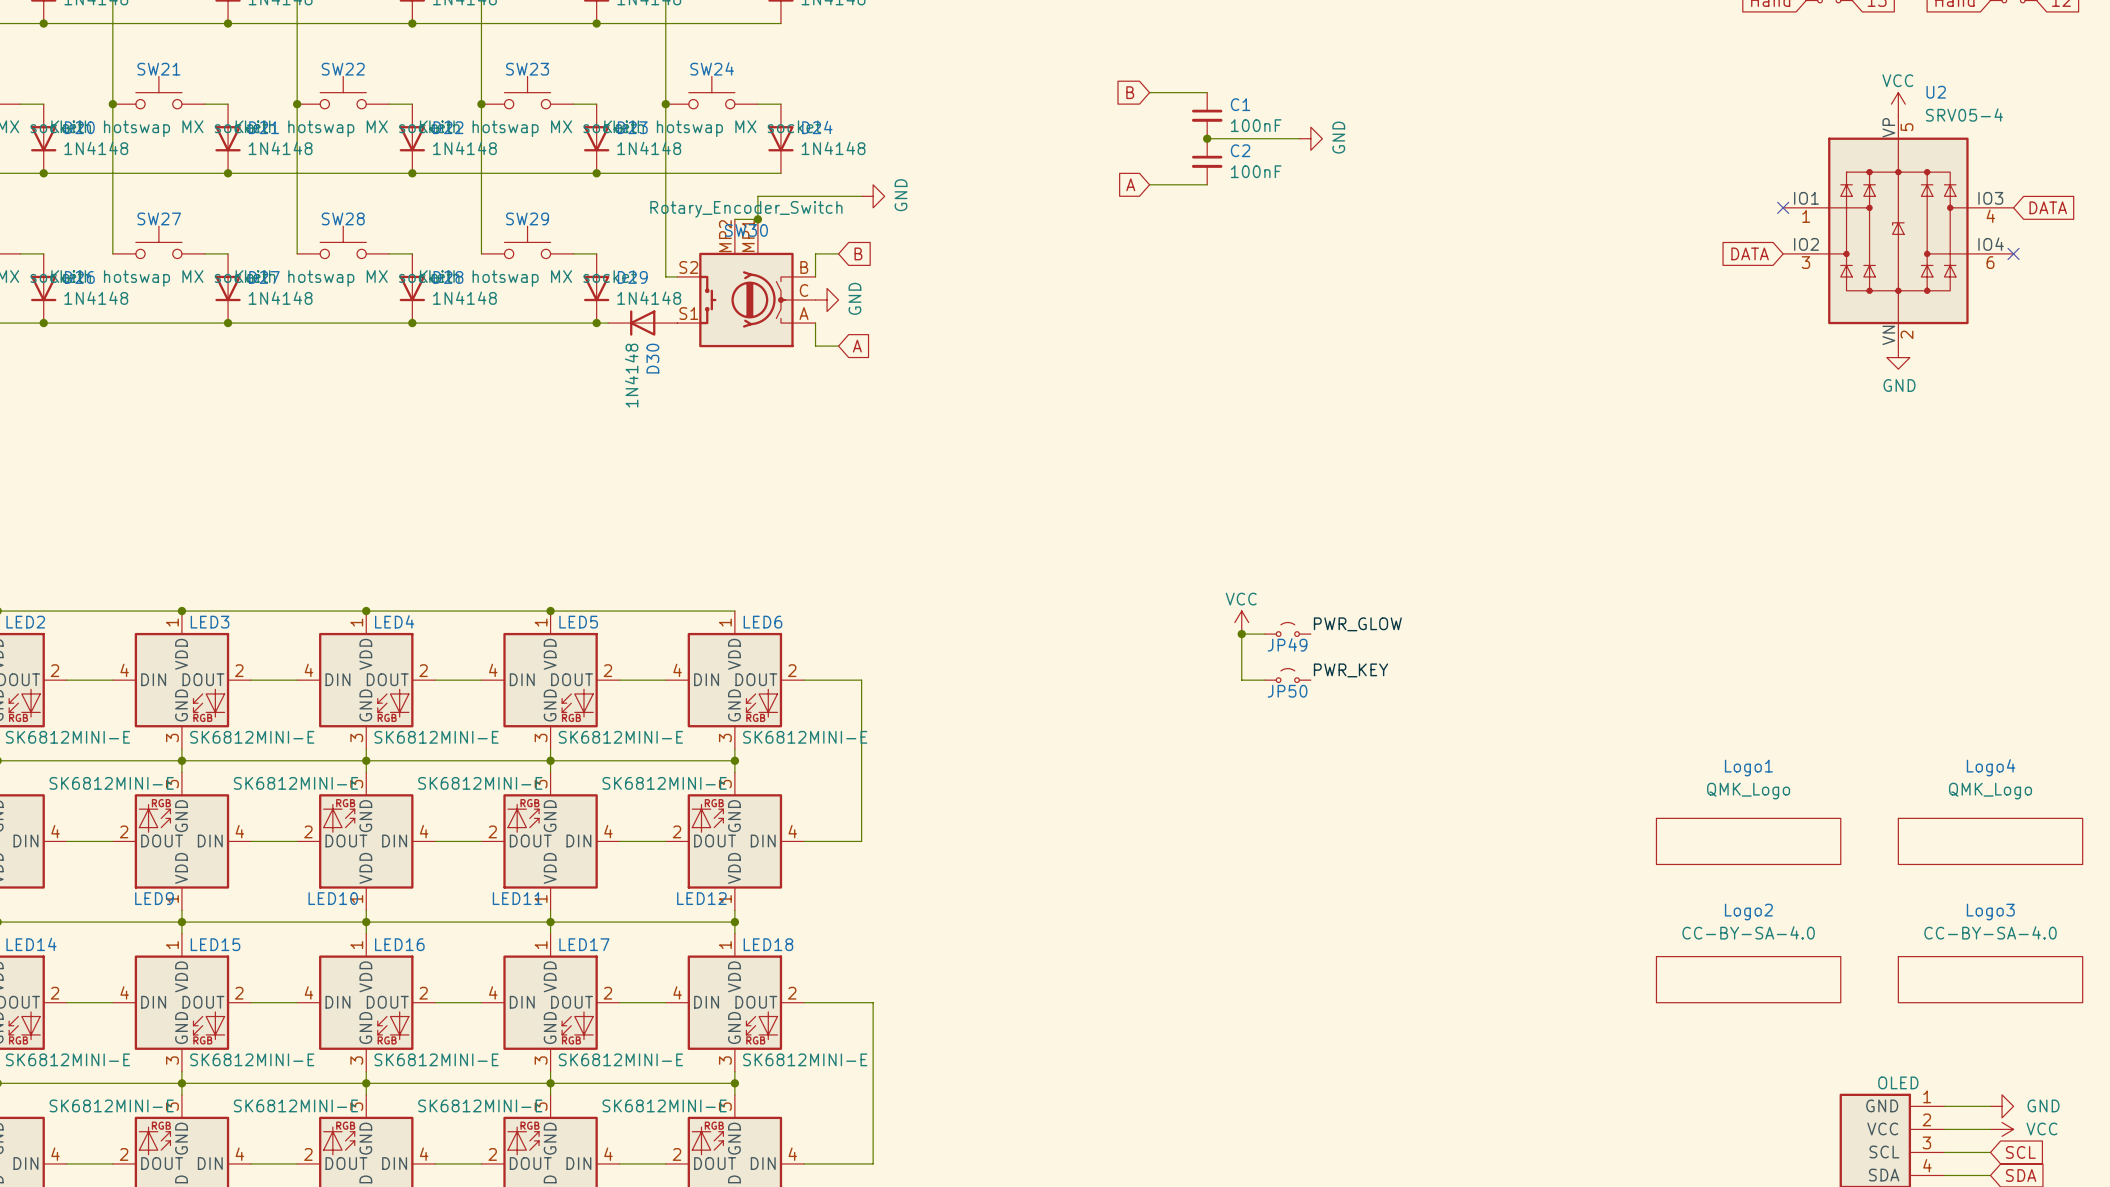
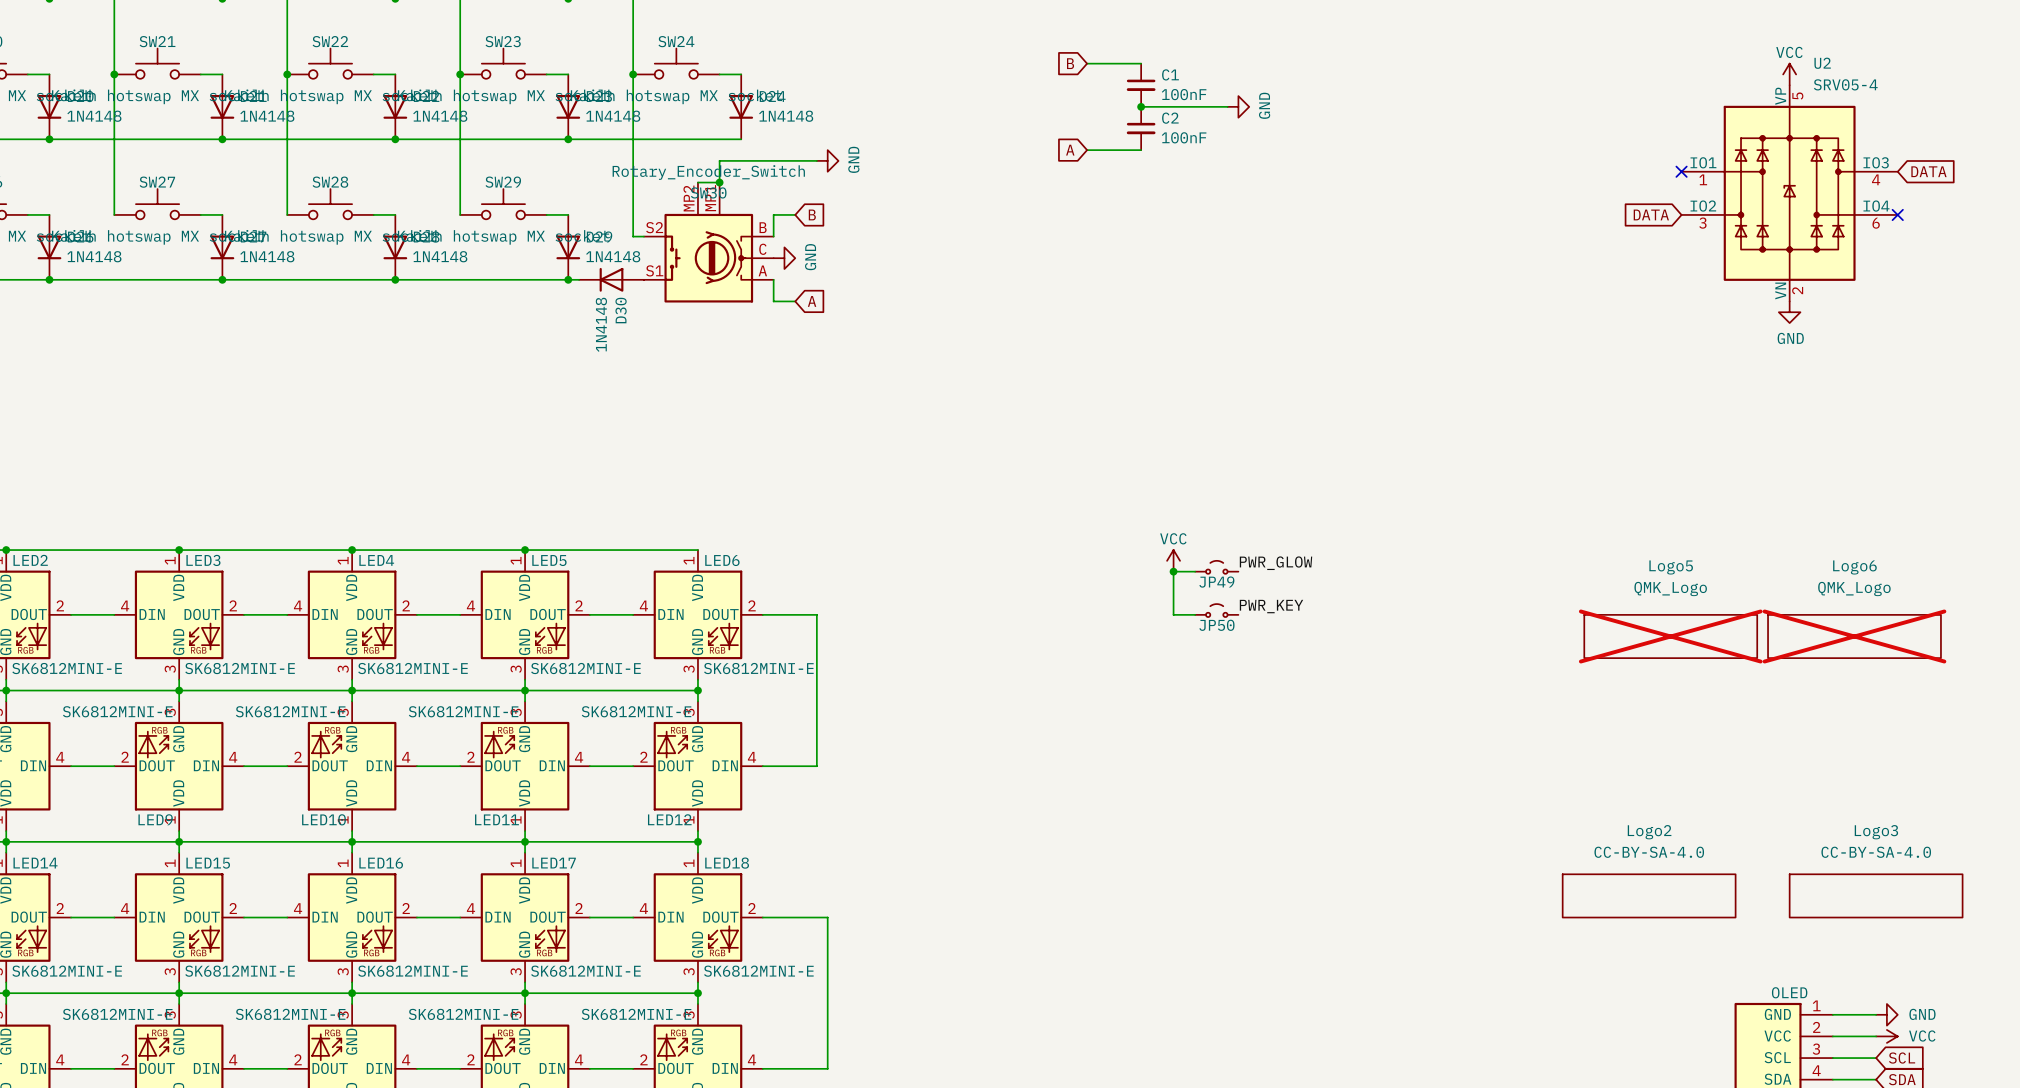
Logo5: none -> QMK_Logo (1670, 636)
Logo6: none -> QMK_Logo (1854, 636)
Logo1: QMK_Logo (1748, 841) -> none
Logo4: QMK_Logo (1990, 841) -> none

